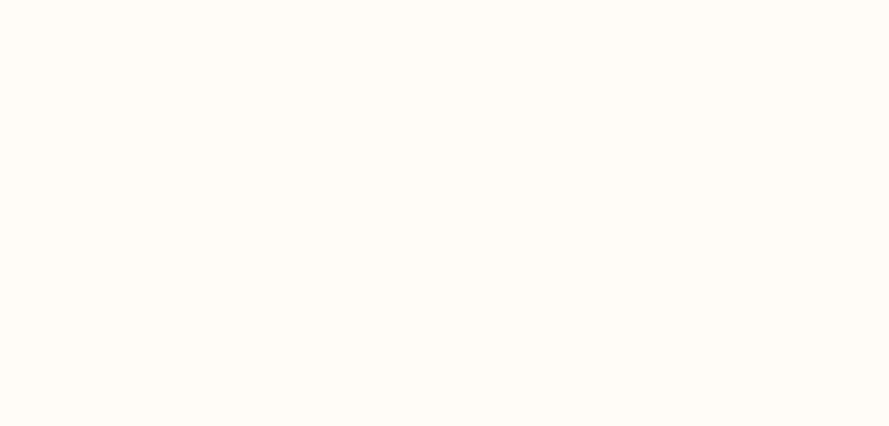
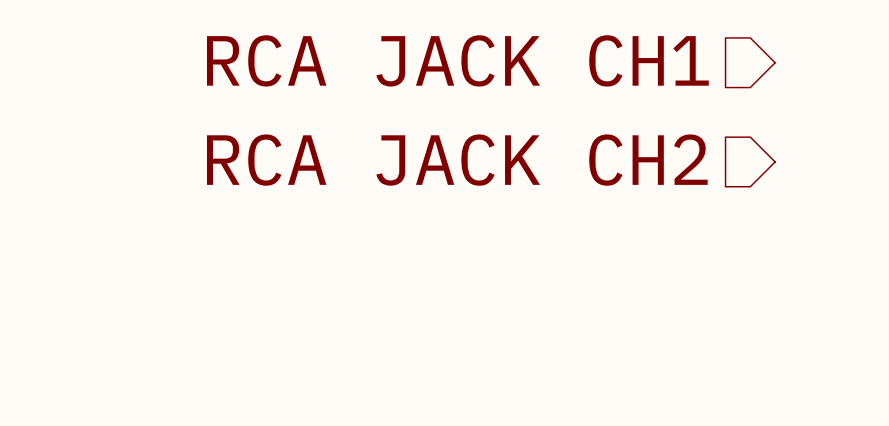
hierarchical label: none -> RCA JACK CH1 (457, 60)
hierarchical label: none -> RCA JACK CH2 (457, 160)

